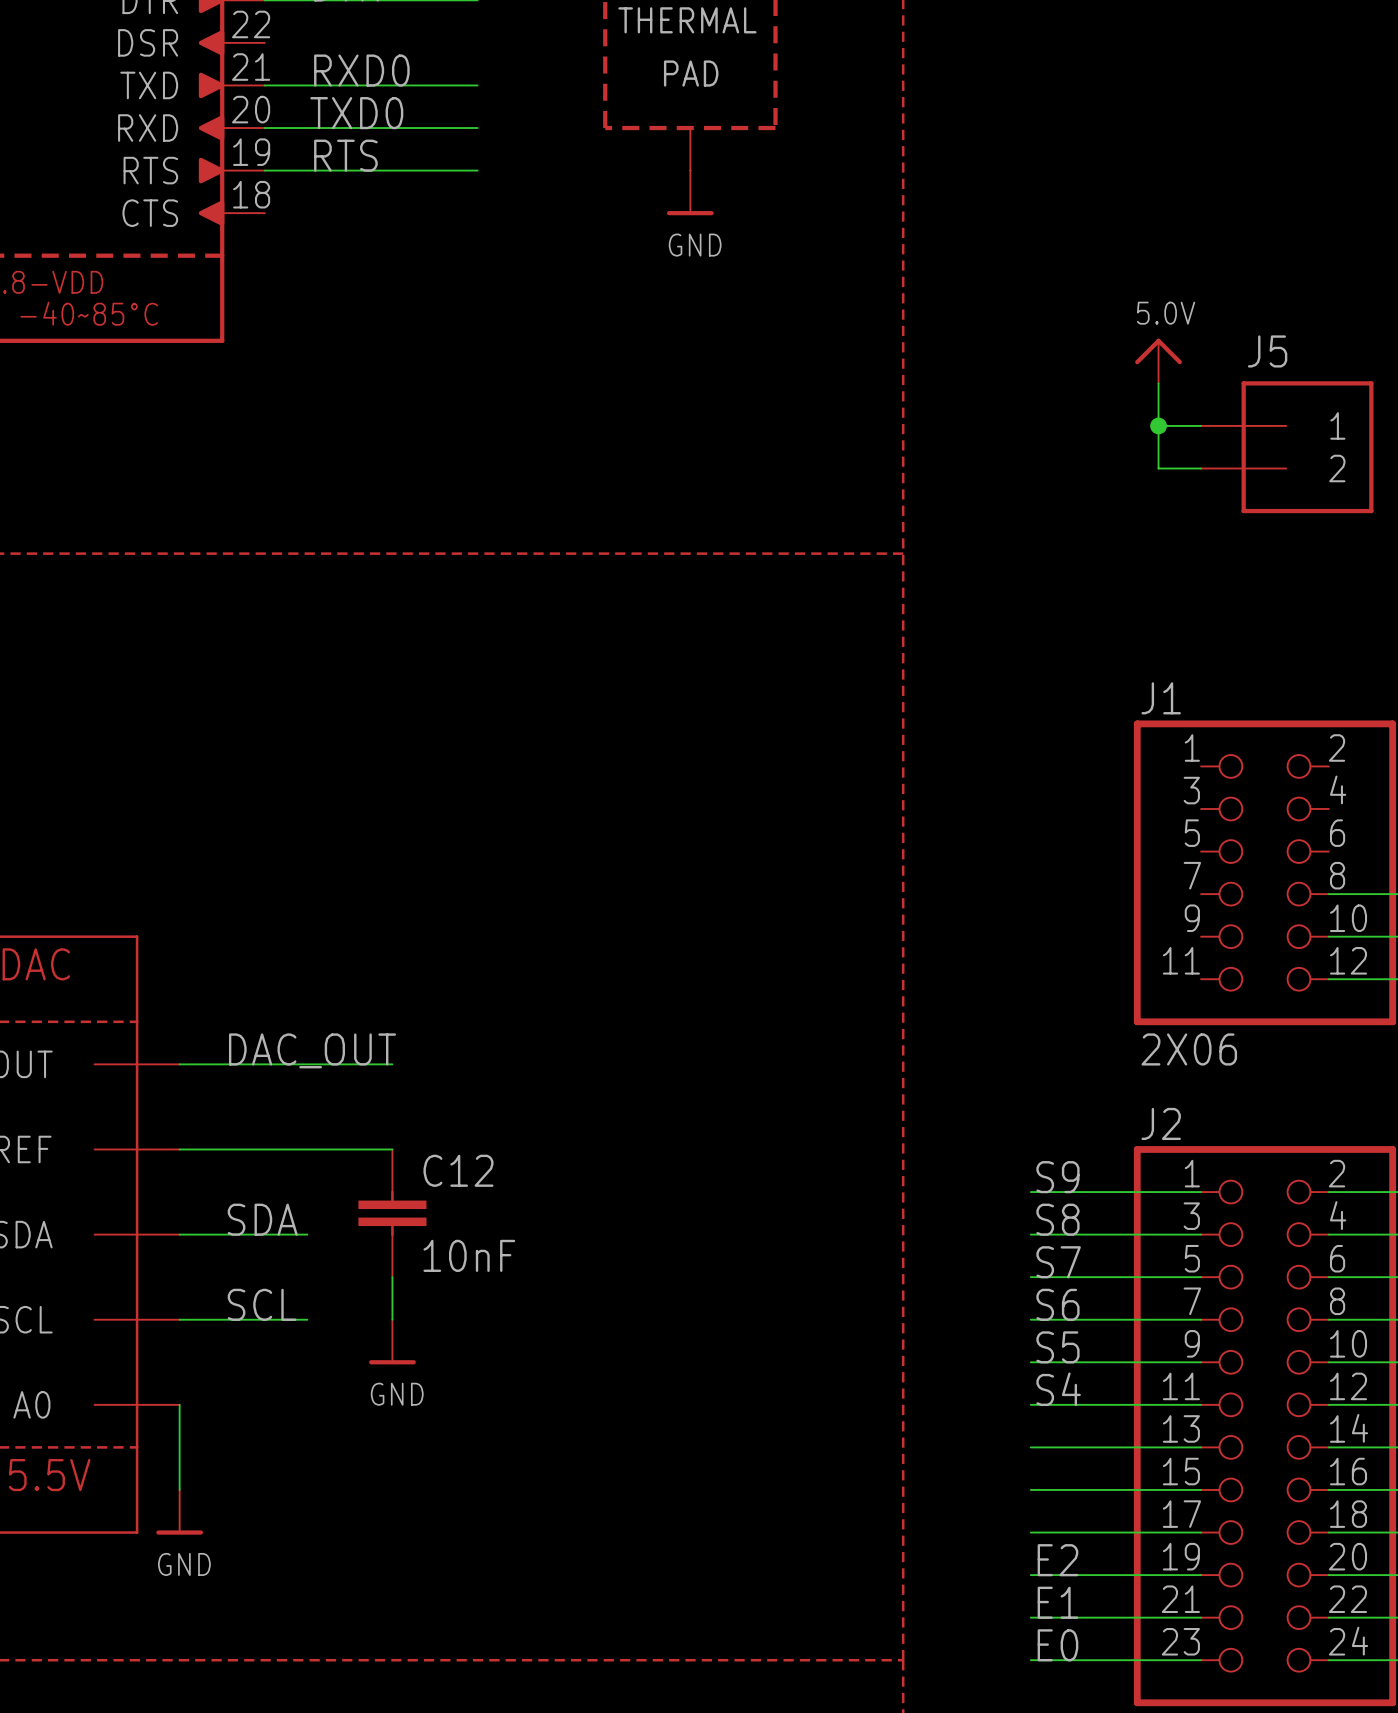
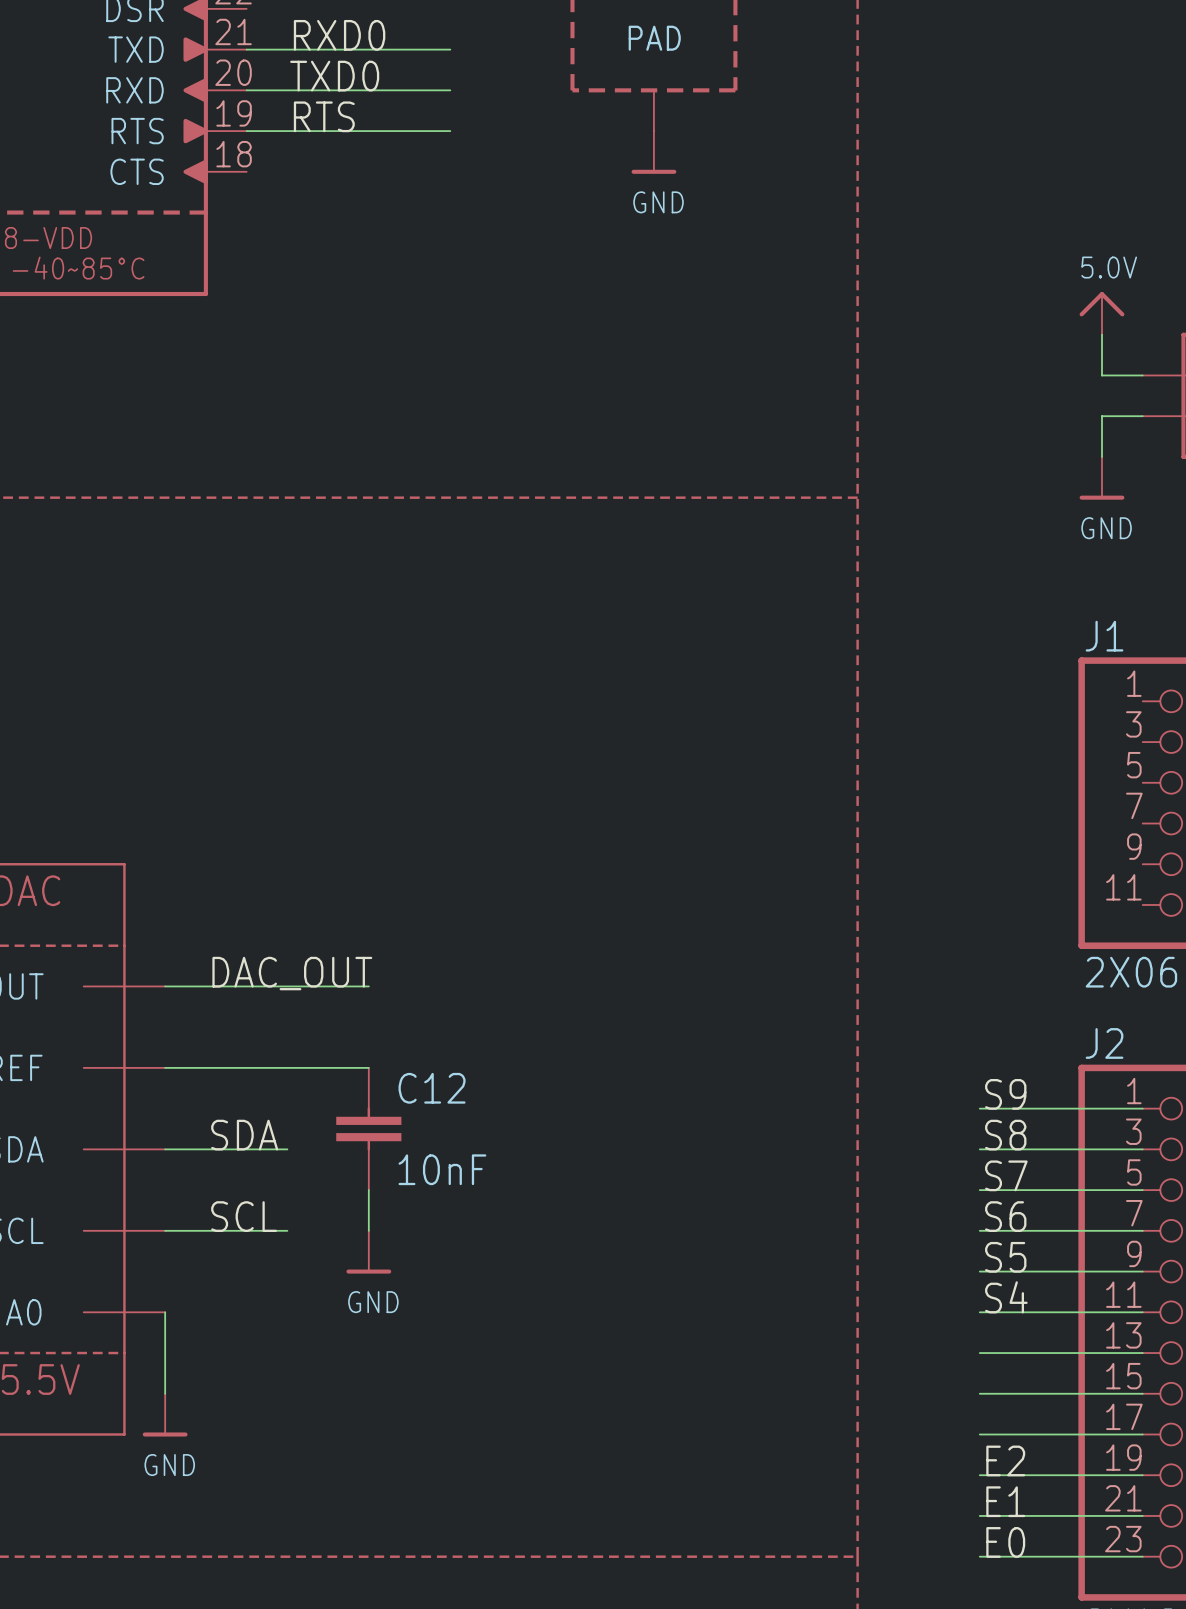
wire: (1158, 425) (1158, 468) -> (1102, 456) (1102, 416)
junction: (1158, 425) -> none
power symbol: none -> GND (1102, 478)

